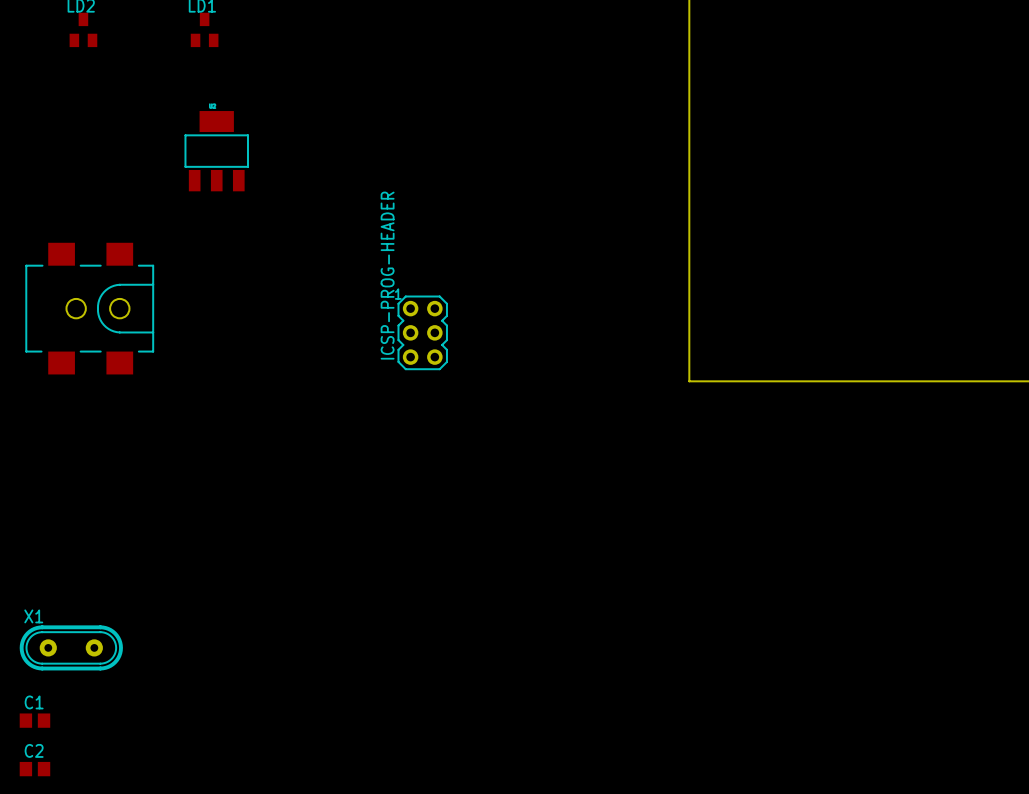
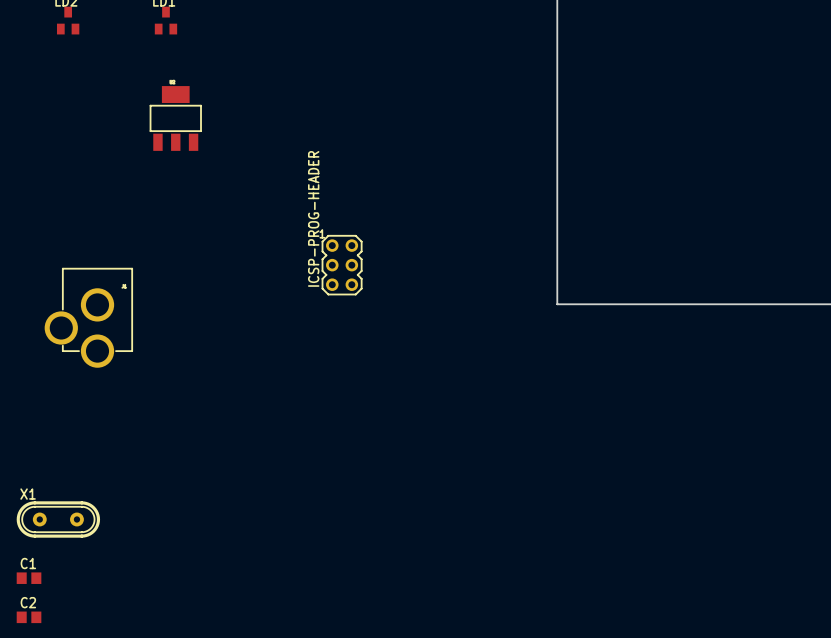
part: (89, 308) -> none
part: none -> (88, 317)

